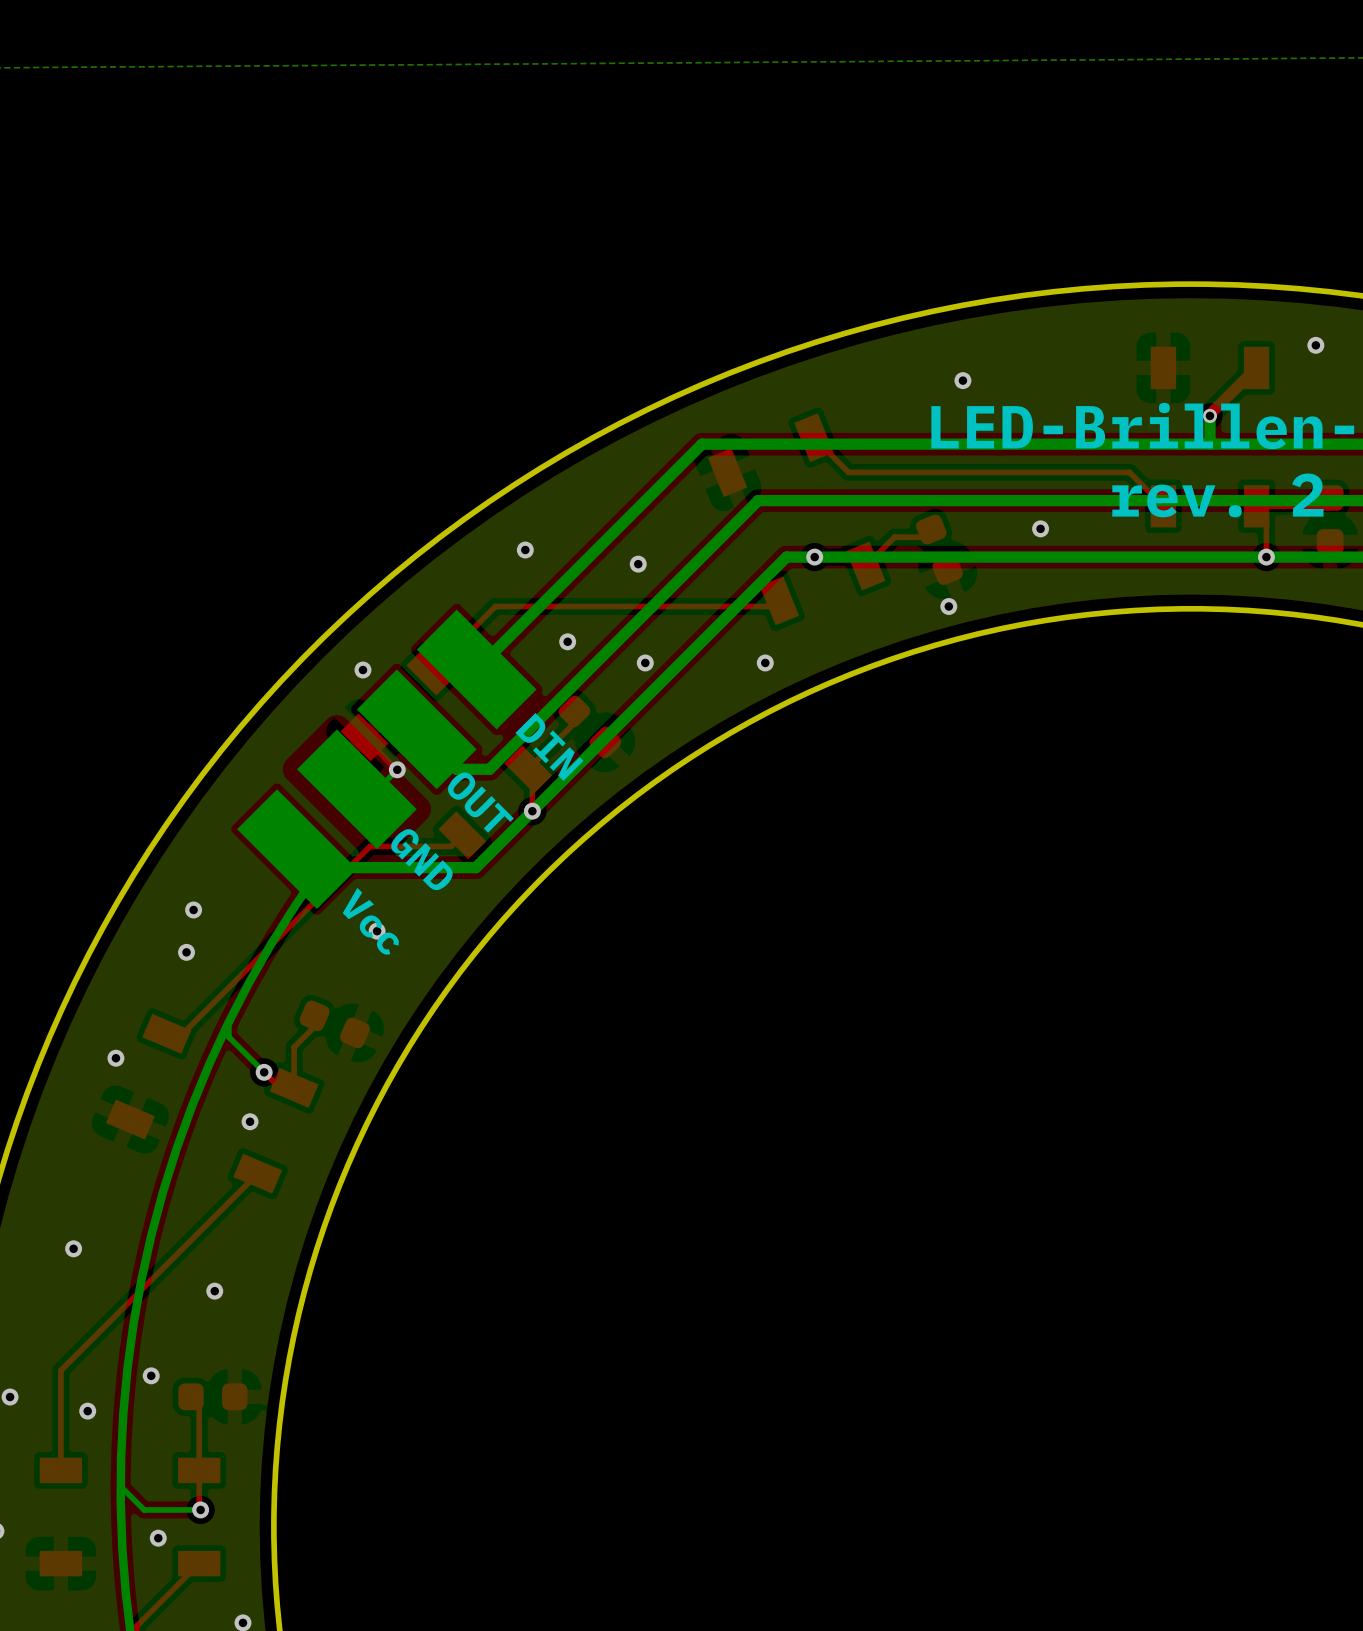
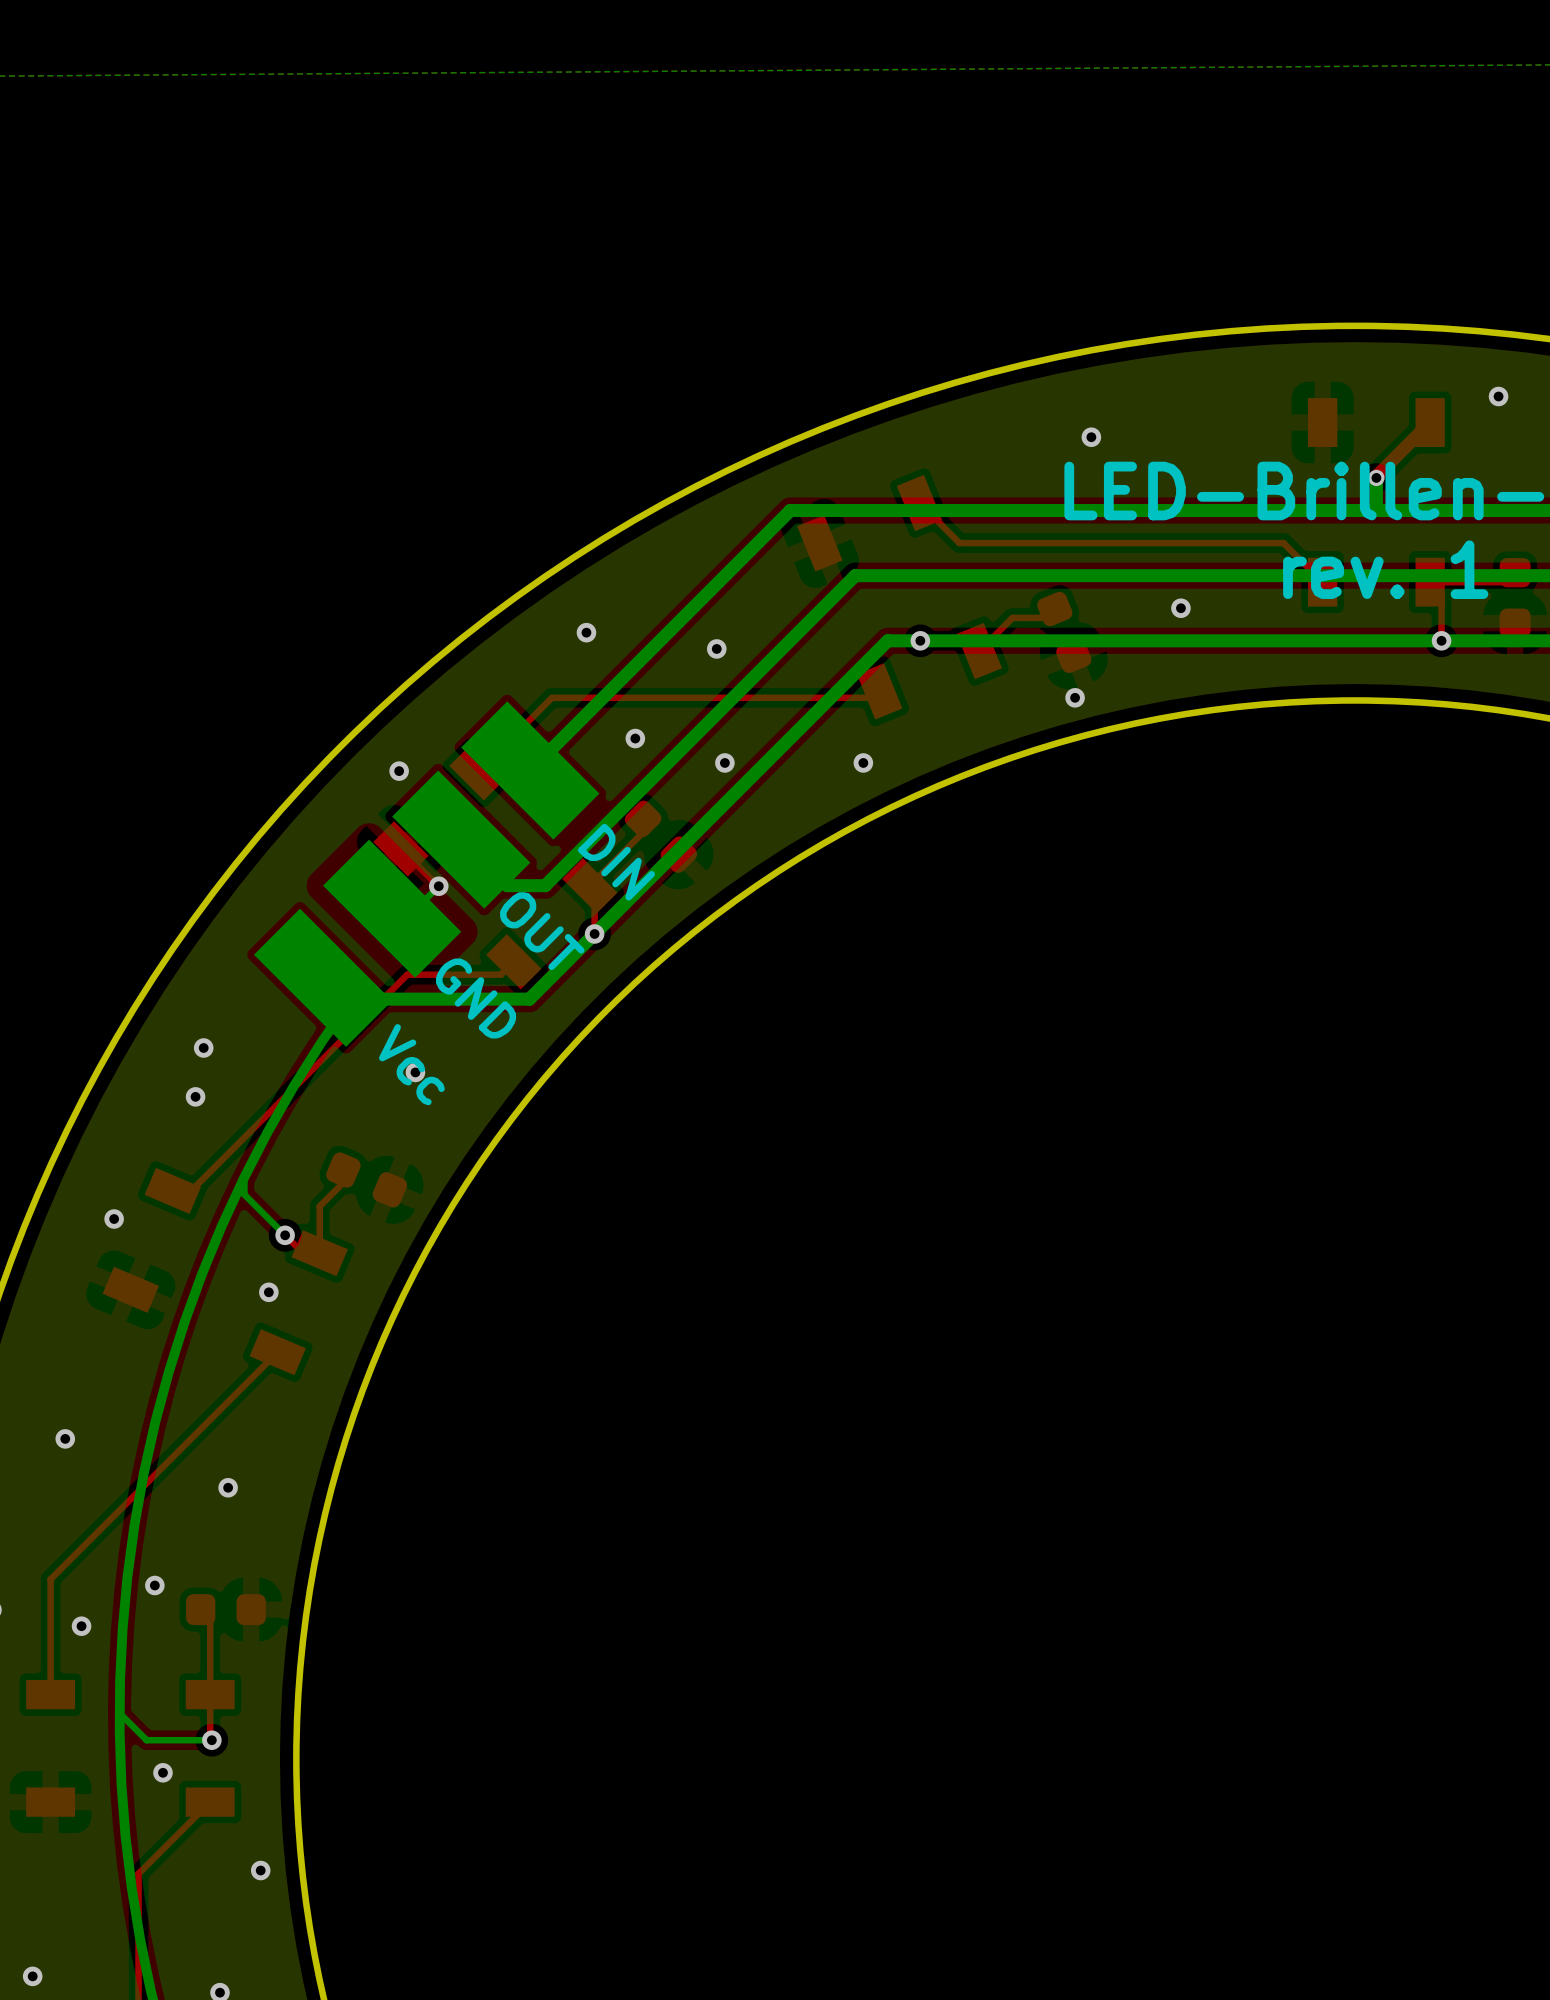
text: rev. 2 (1217, 495) -> rev. 1 (1385, 569)

